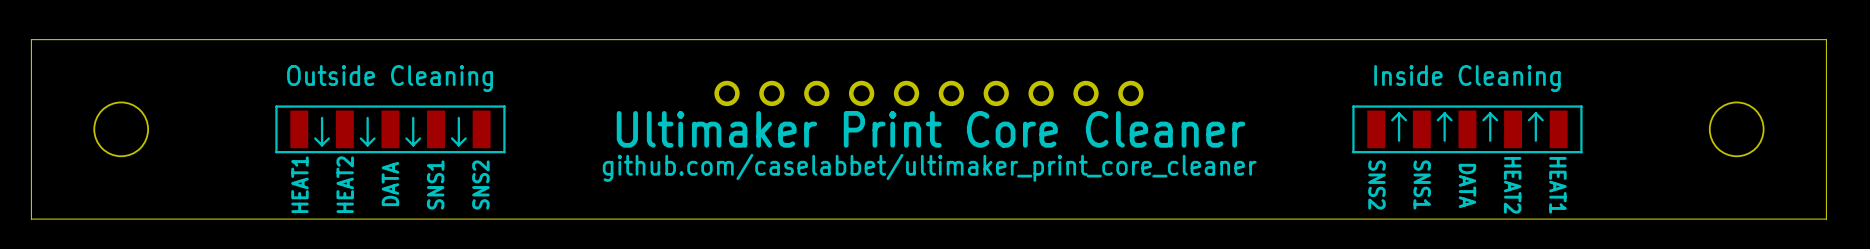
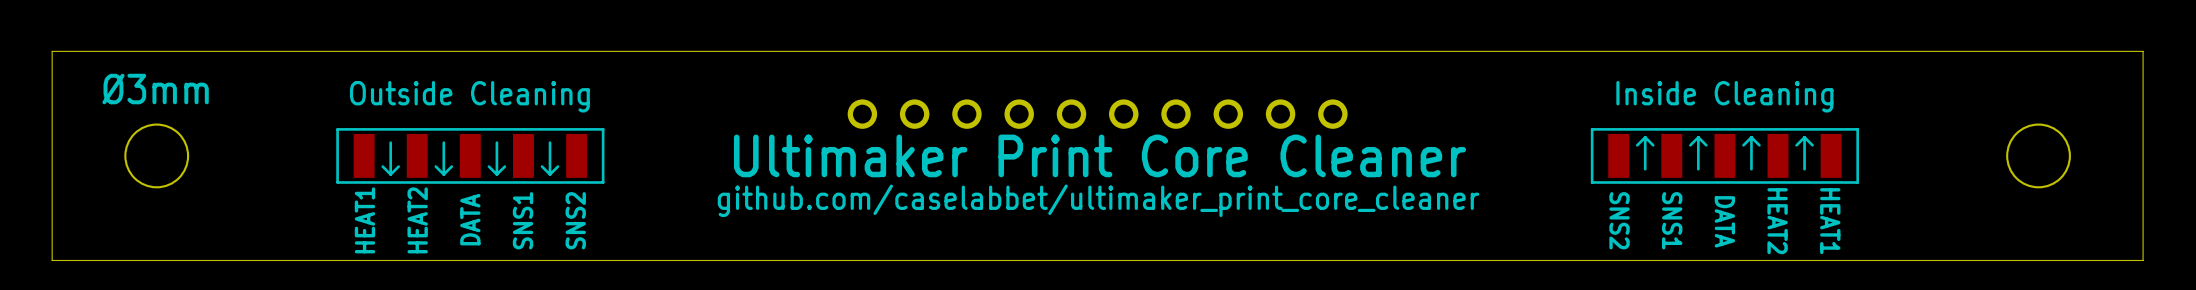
text: none -> Ø3mm (155, 89)

